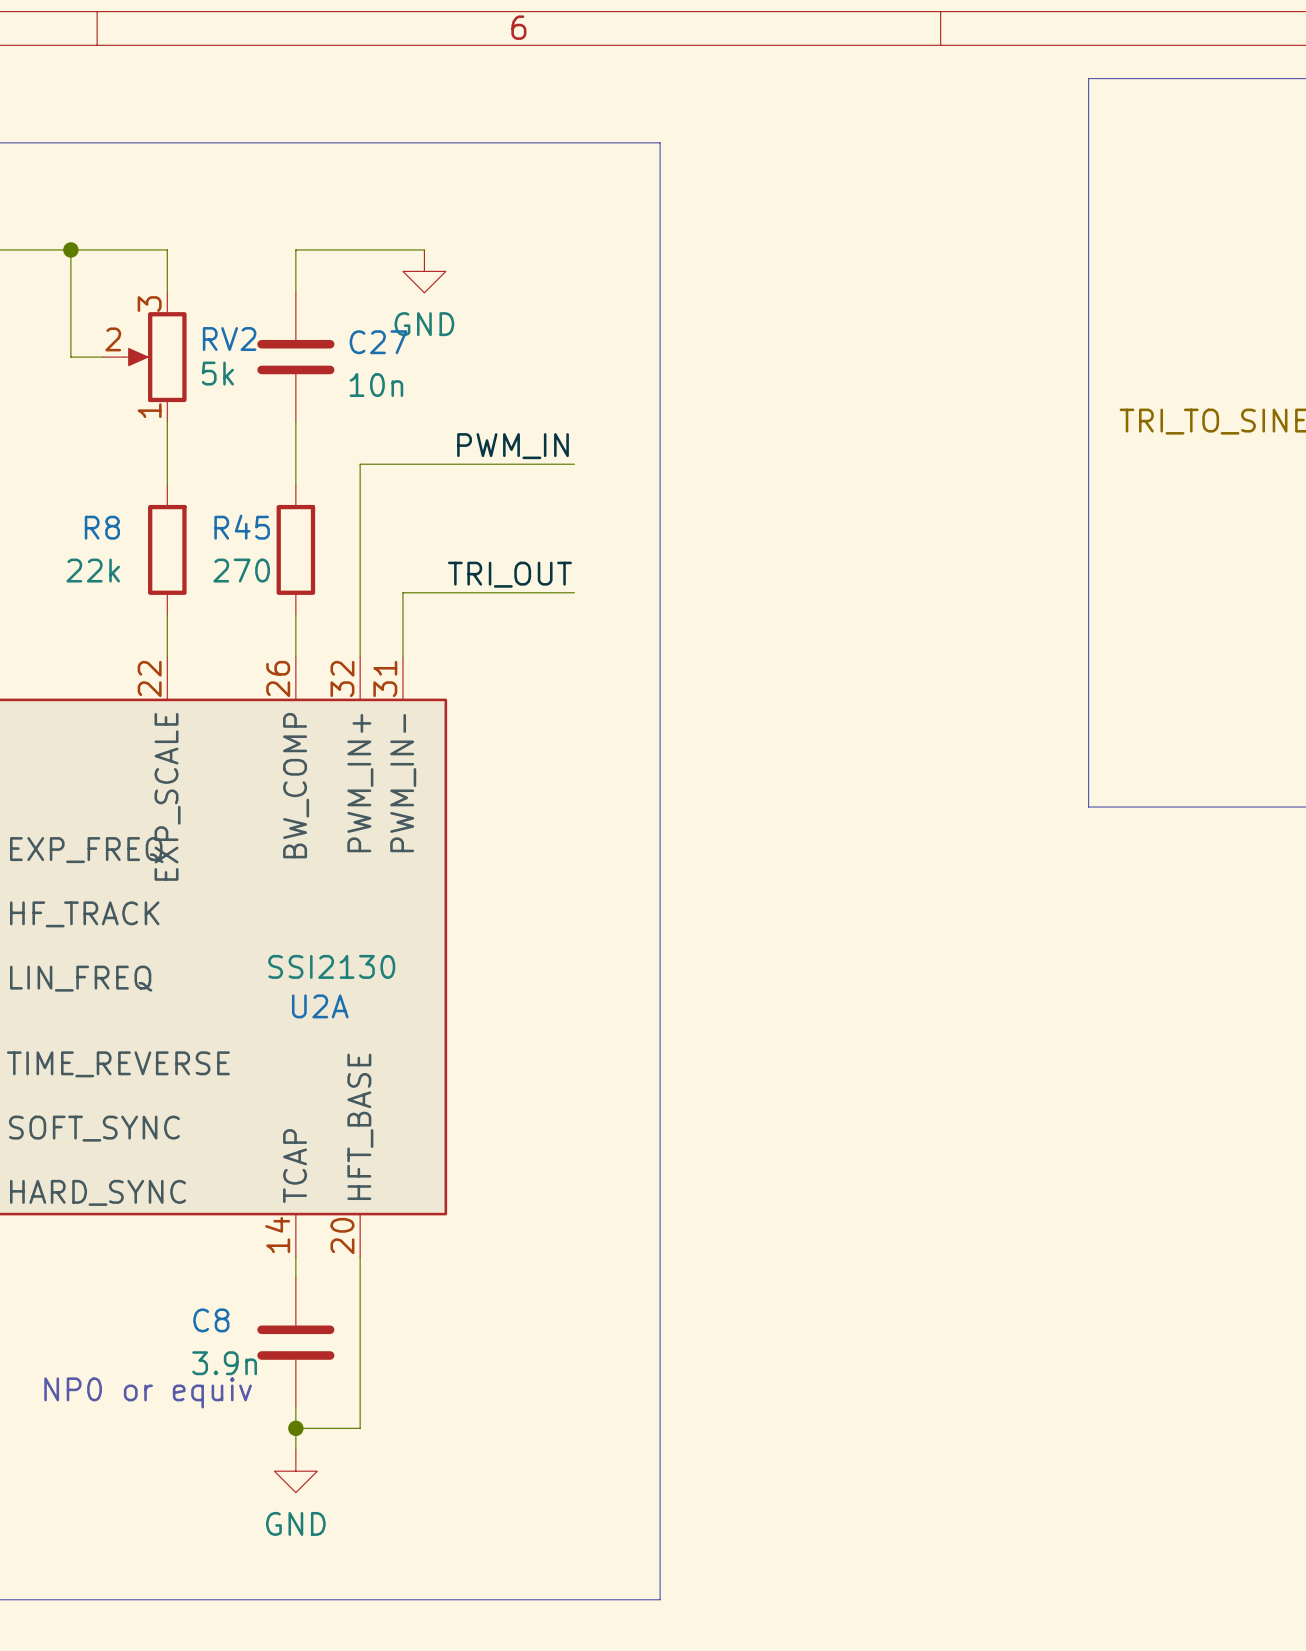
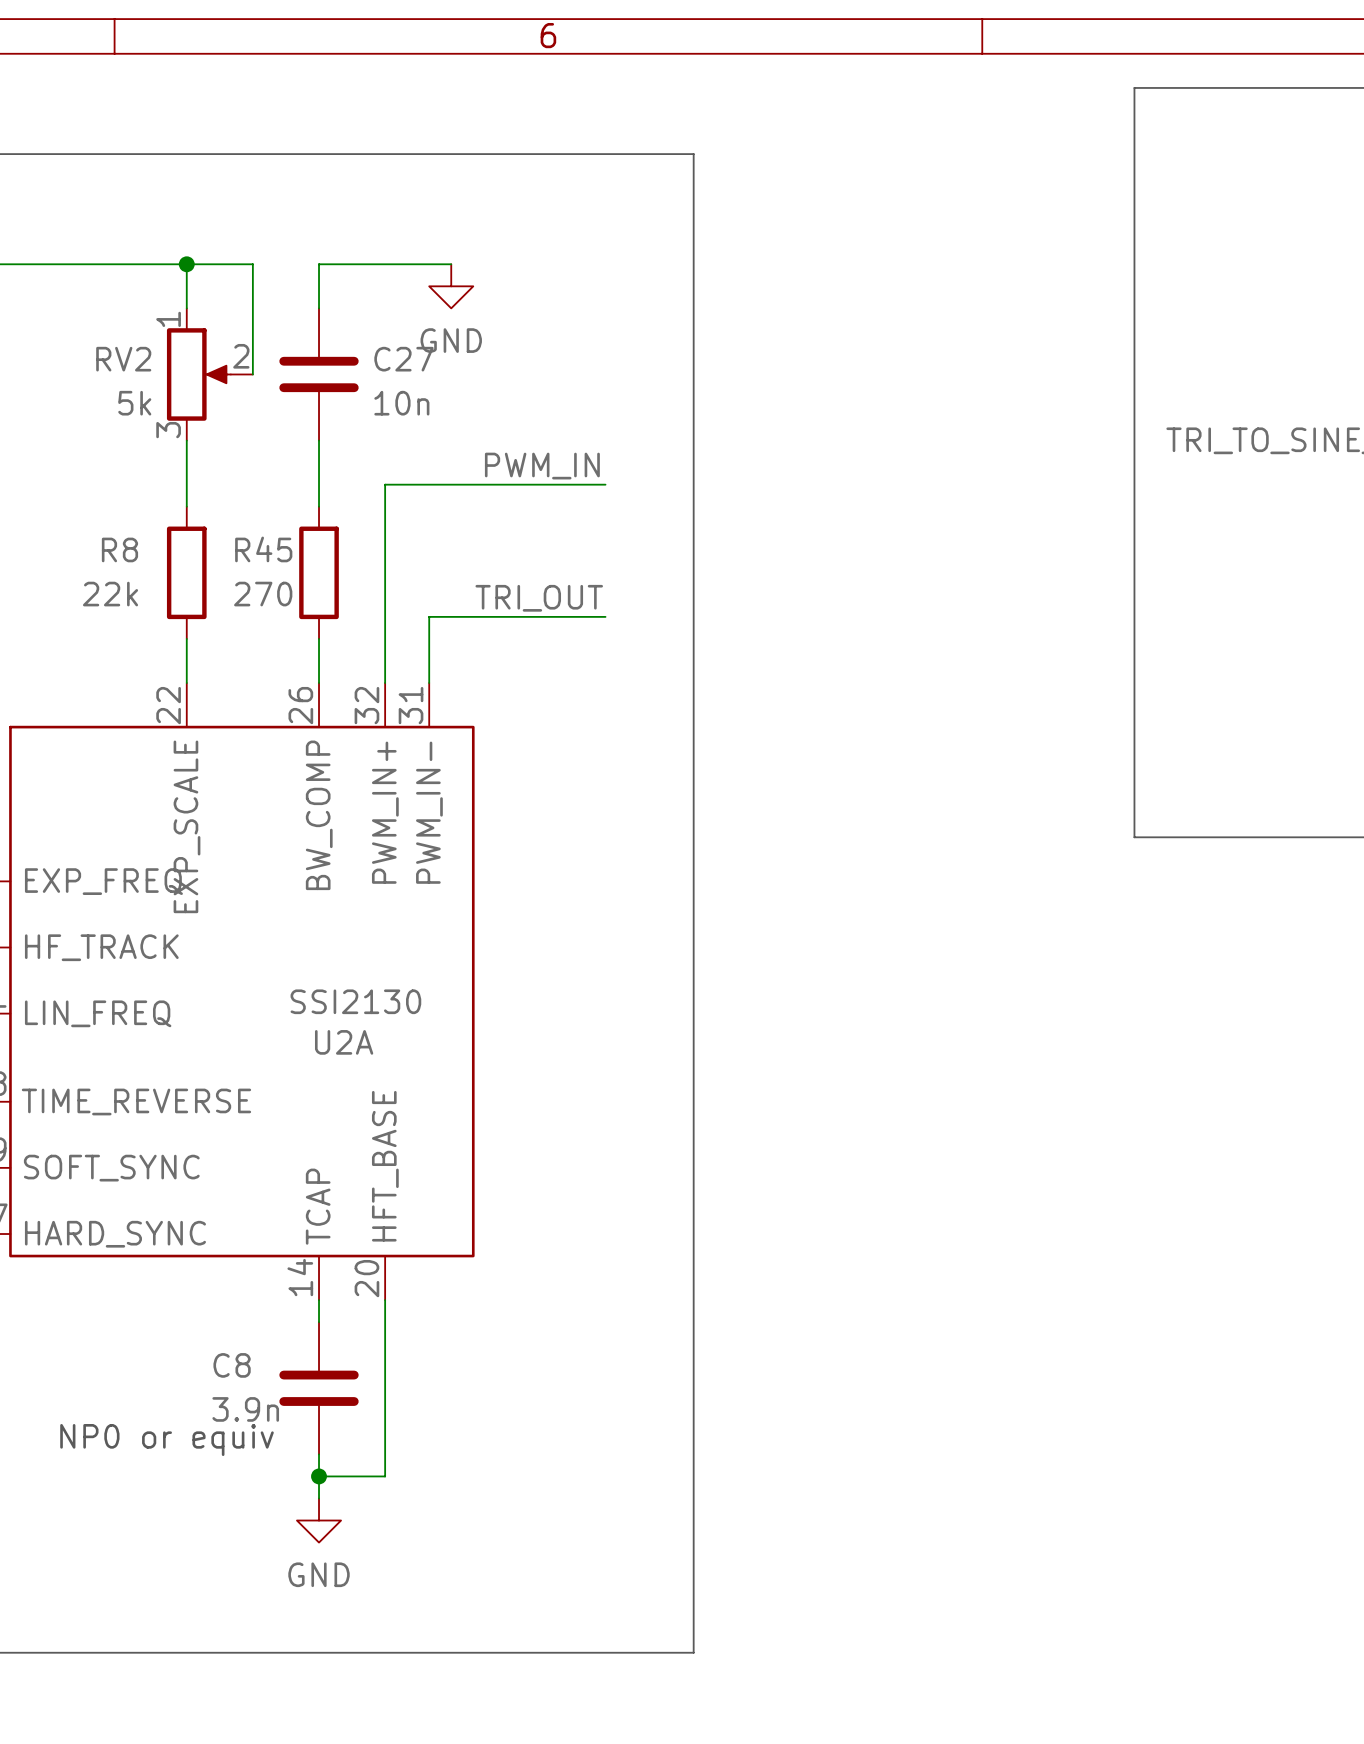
wire: (70, 249) (70, 357) (103, 357) -> none
junction position: (70, 249) -> (186, 264)
wire: none -> (186, 264) (252, 264) (252, 374)
RV2 rotation: 0° (155, 357) -> 180° (198, 374)
RV2 value position: 5k (217, 373) -> 5k (134, 403)

